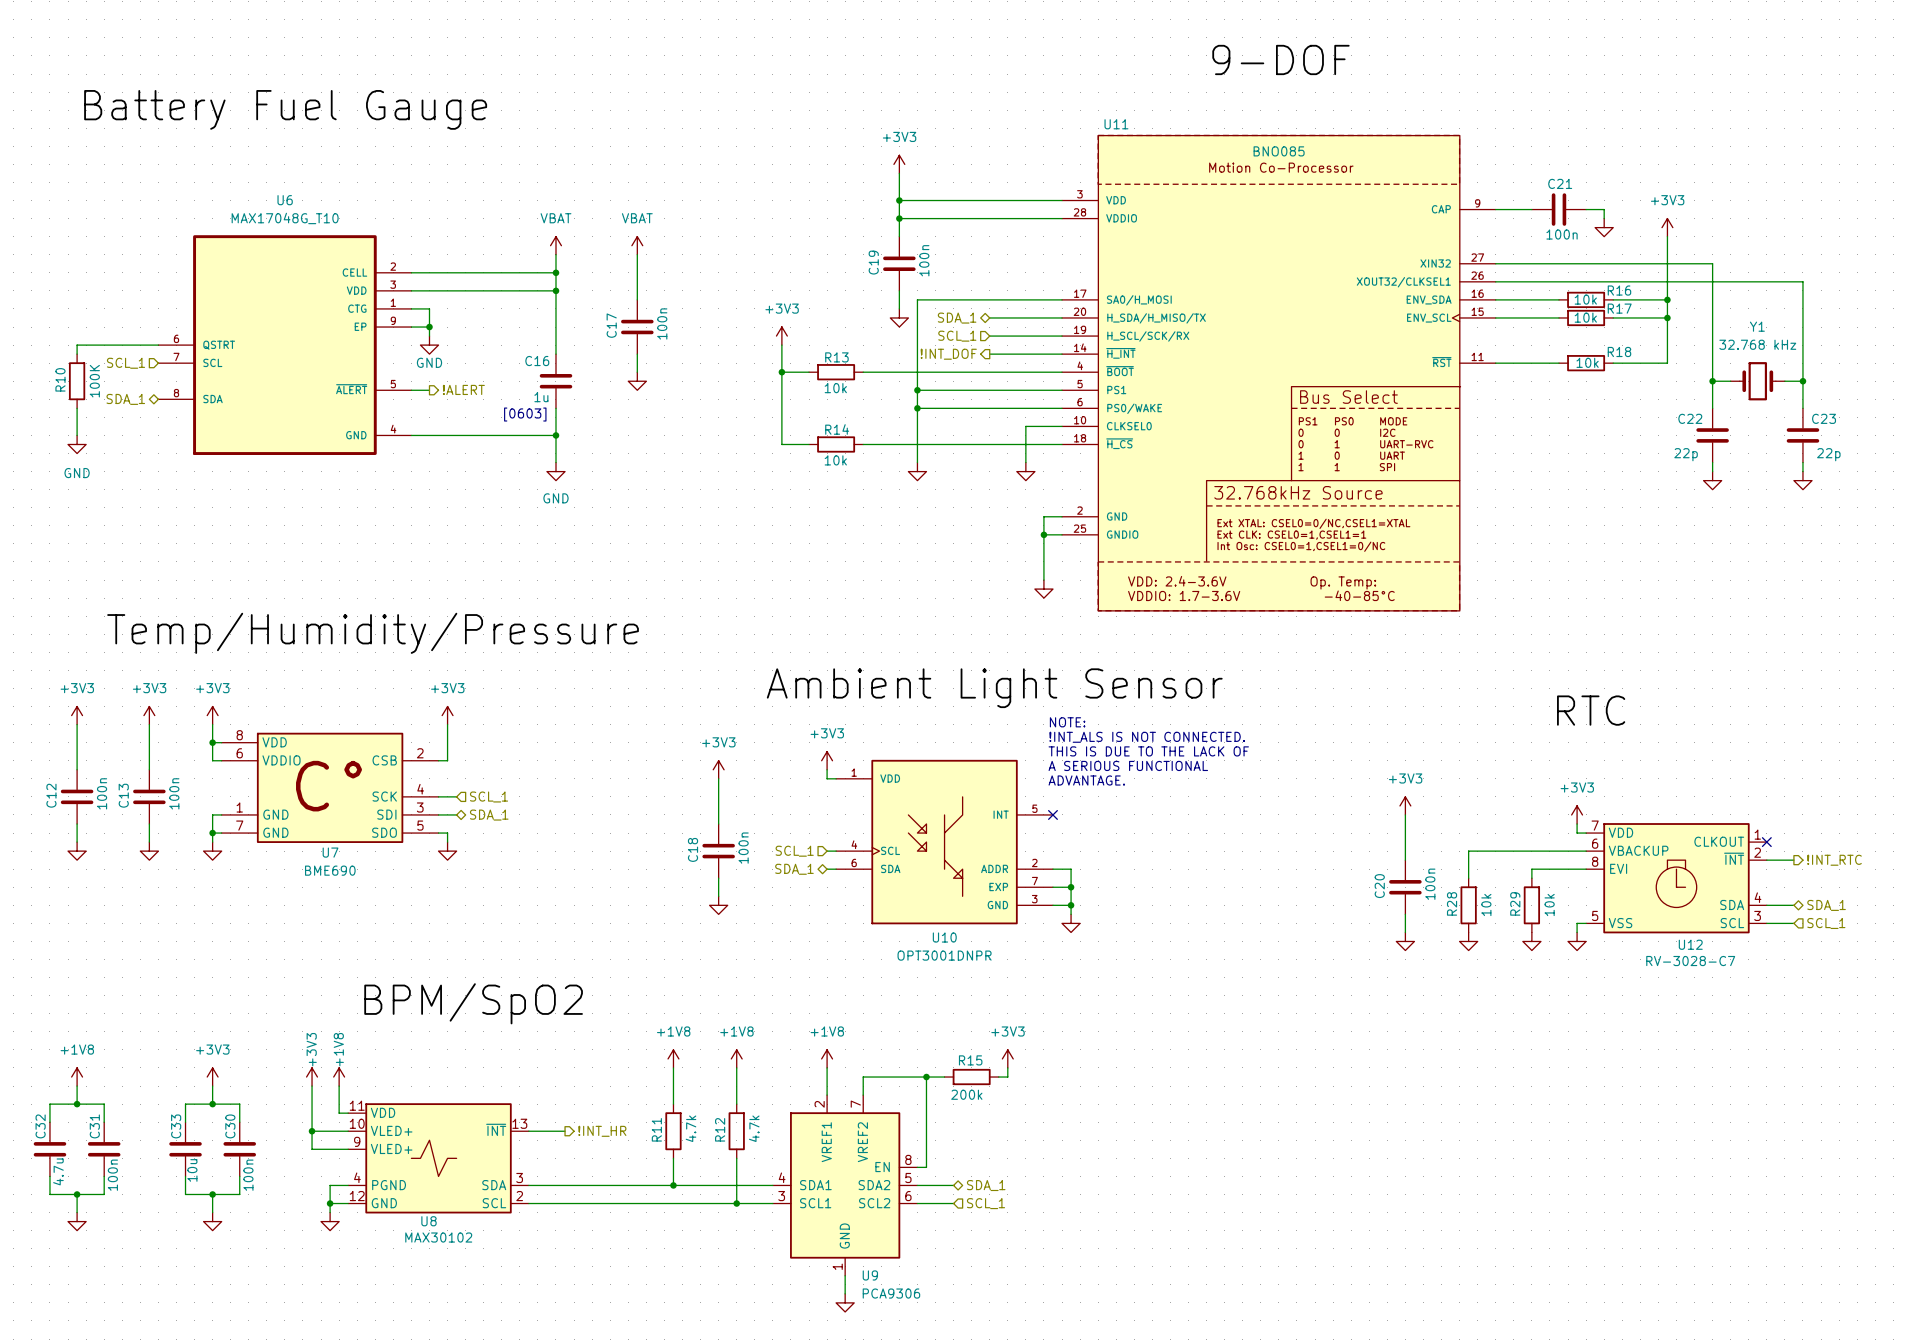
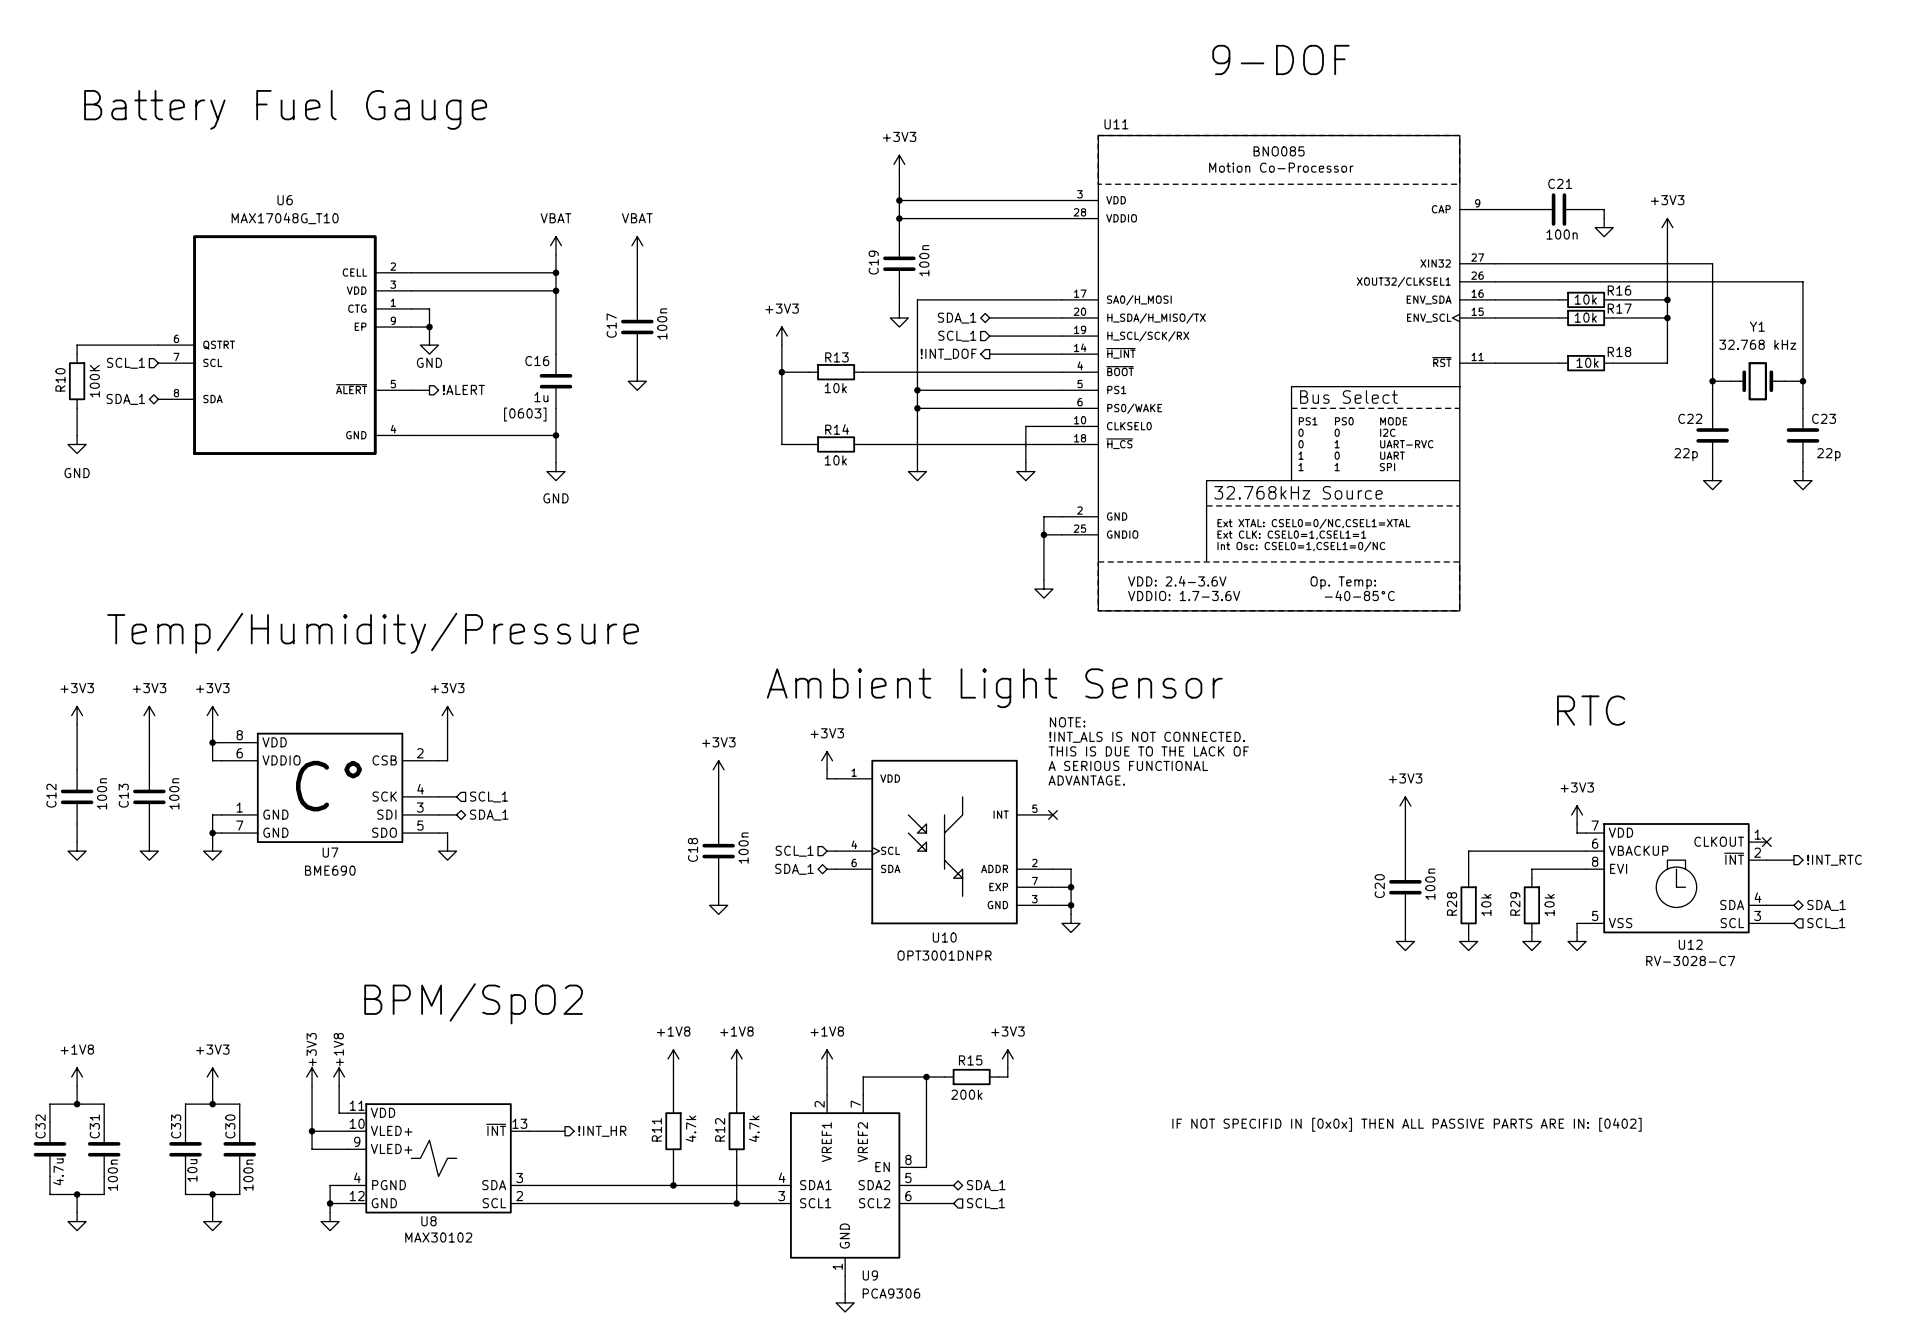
text: none -> IF NOT SPECIFID IN [0x0x] THEN ALL PASSIVE PARTS ARE IN: [0402] (1406, 1124)

